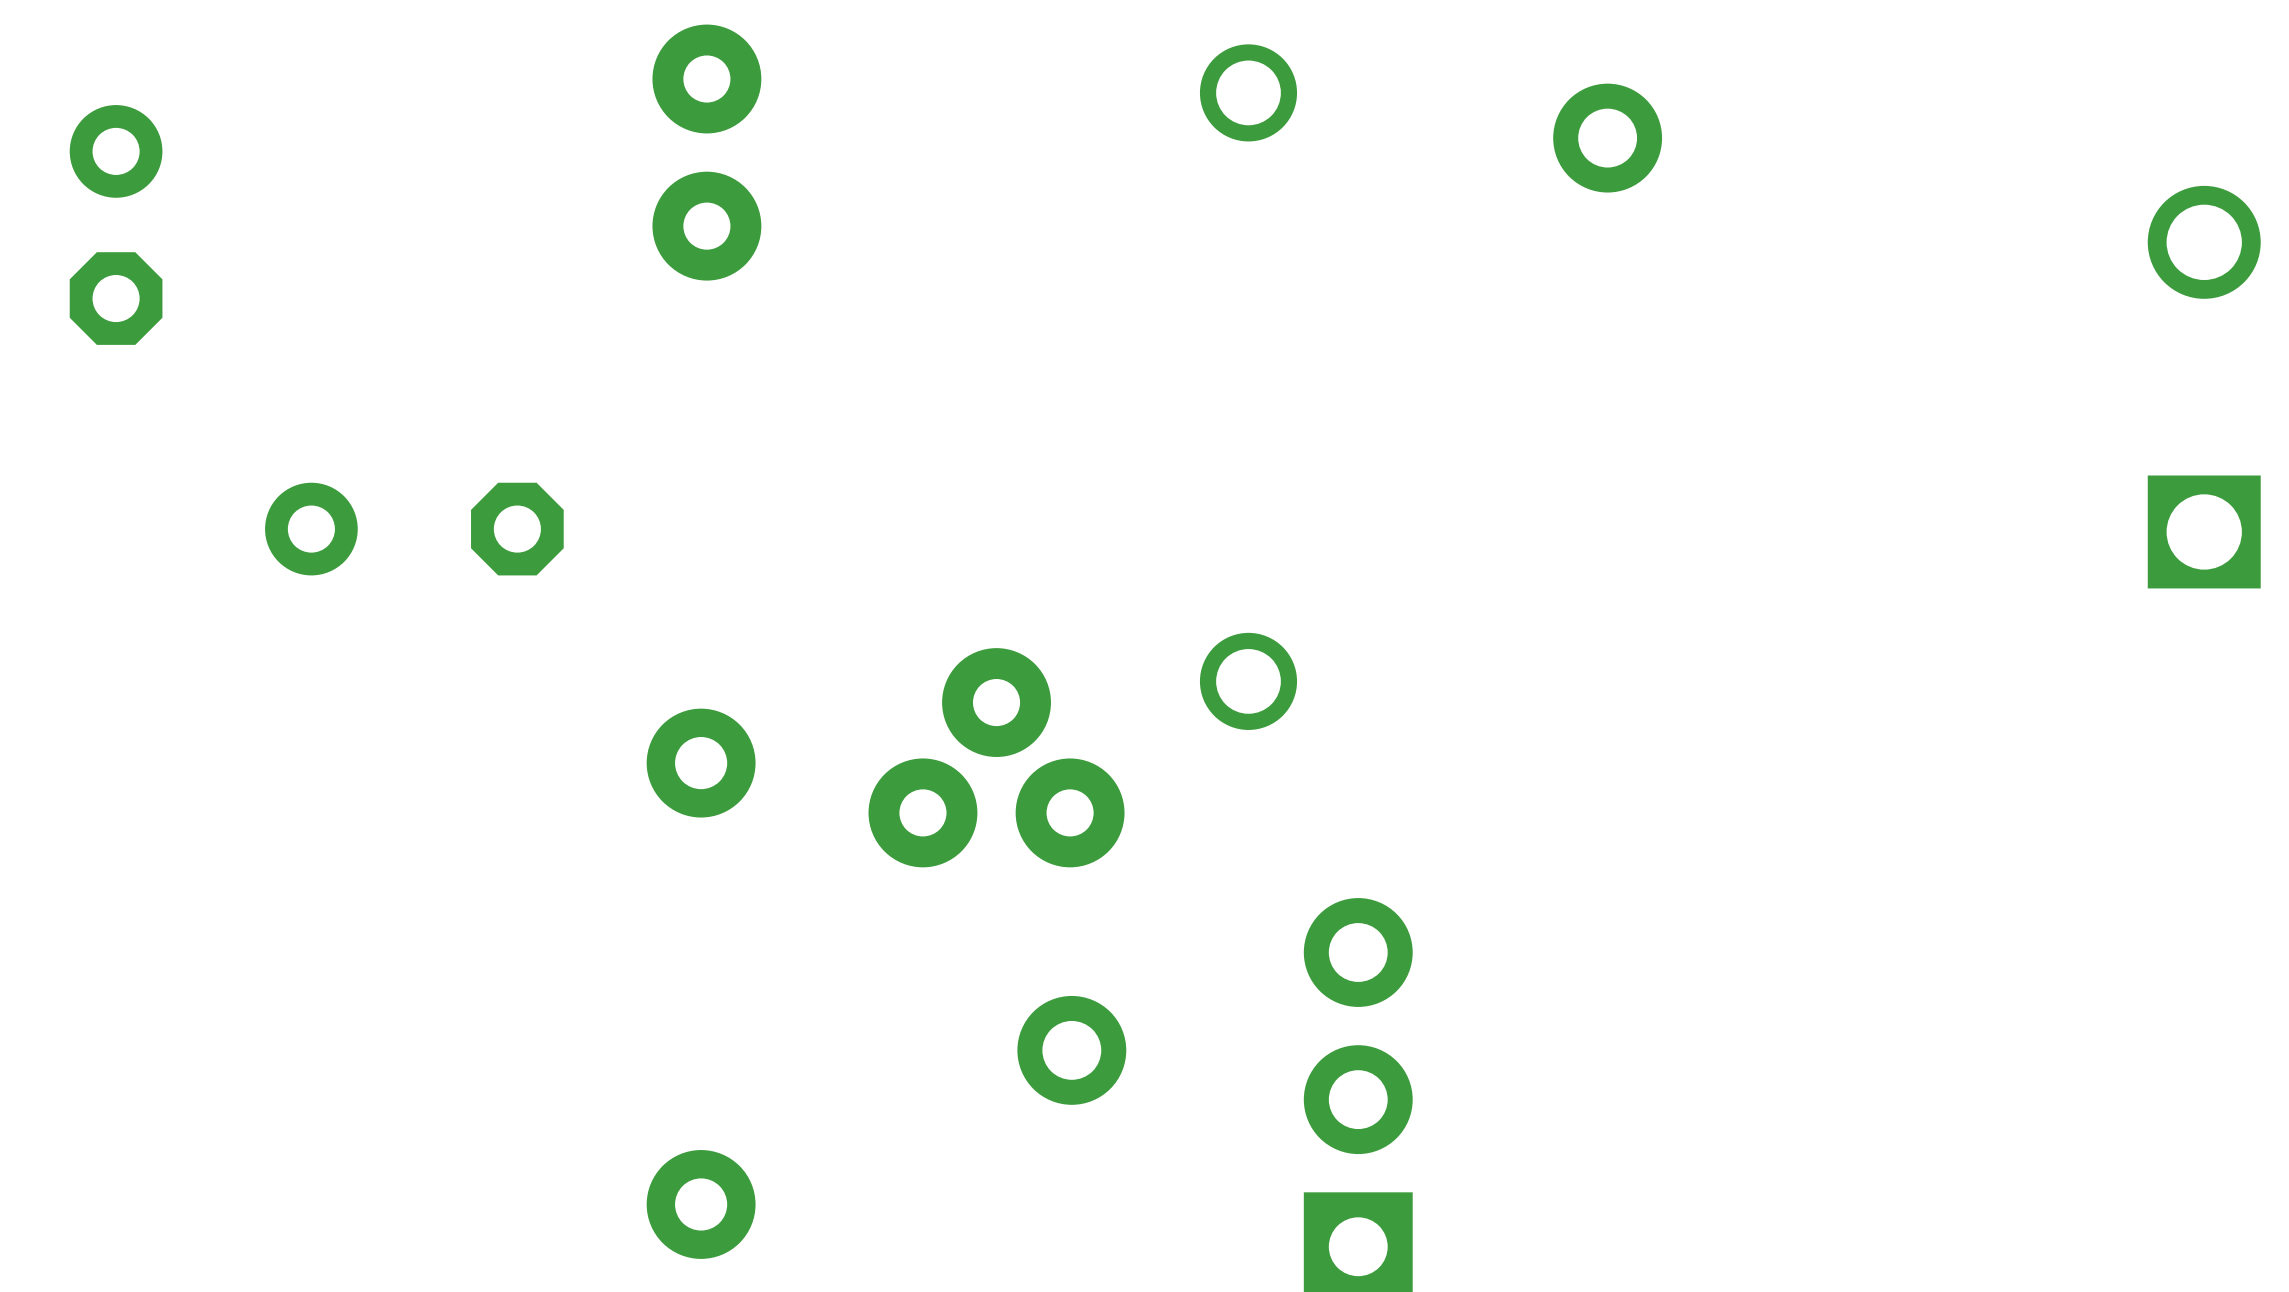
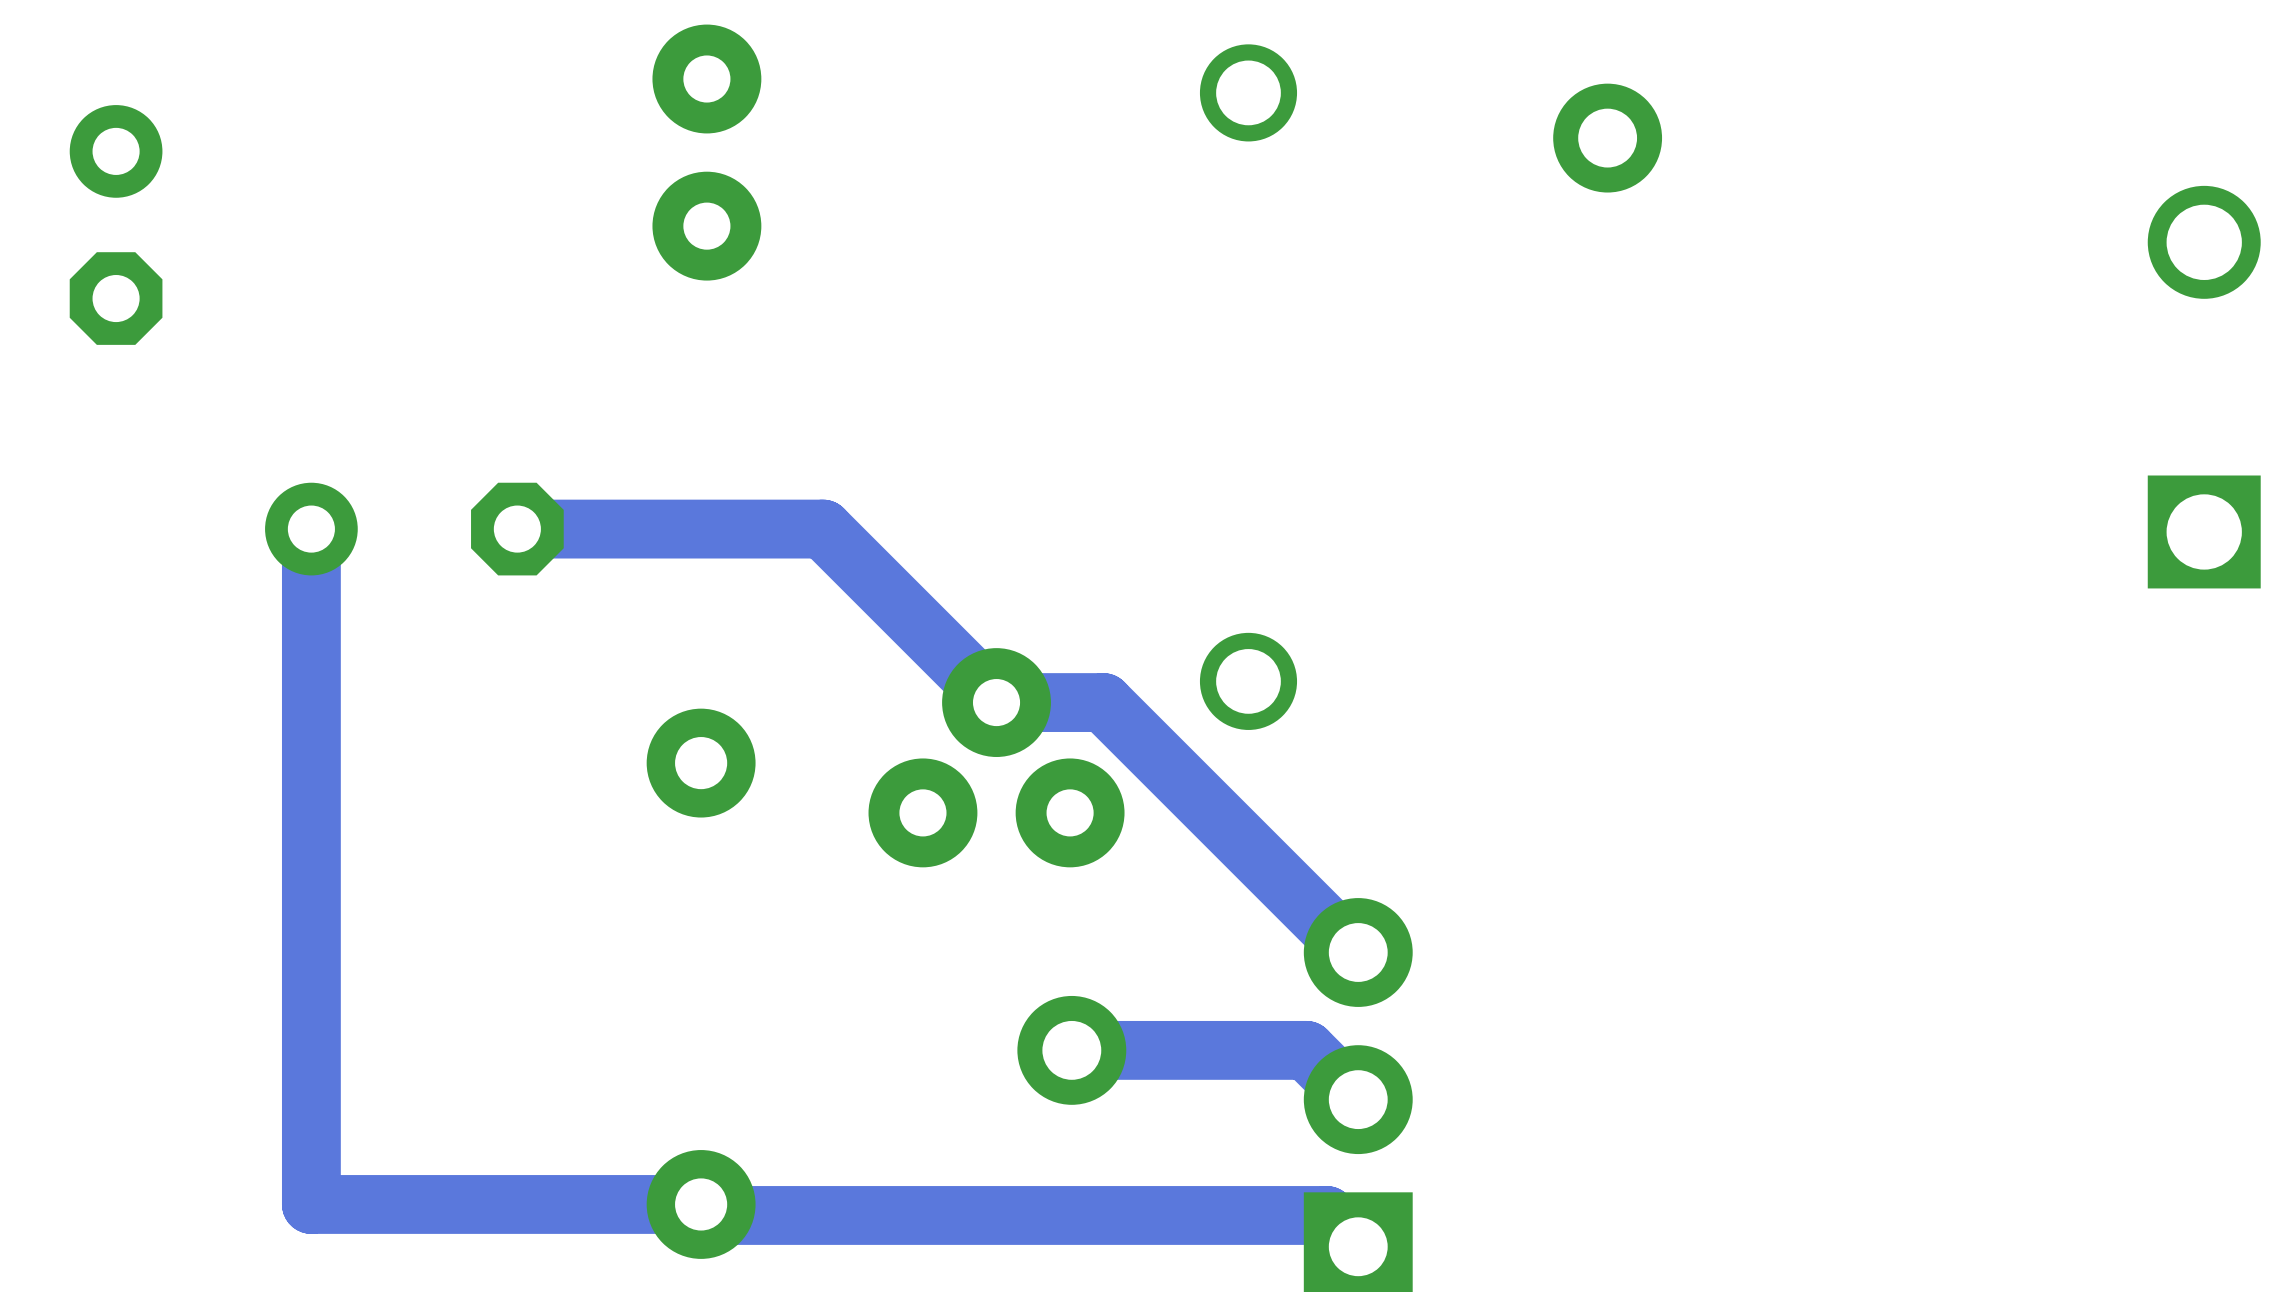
track: none -> (311, 529) (311, 1204) (701, 1204) (730, 1215) (1326, 1215) (1358, 1246)
track: none -> (517, 529) (823, 529) (996, 702) (1103, 702) (1355, 954) (1358, 954) (1358, 952)
track: none -> (1071, 1050) (1306, 1050) (1355, 1099) (1358, 1099)

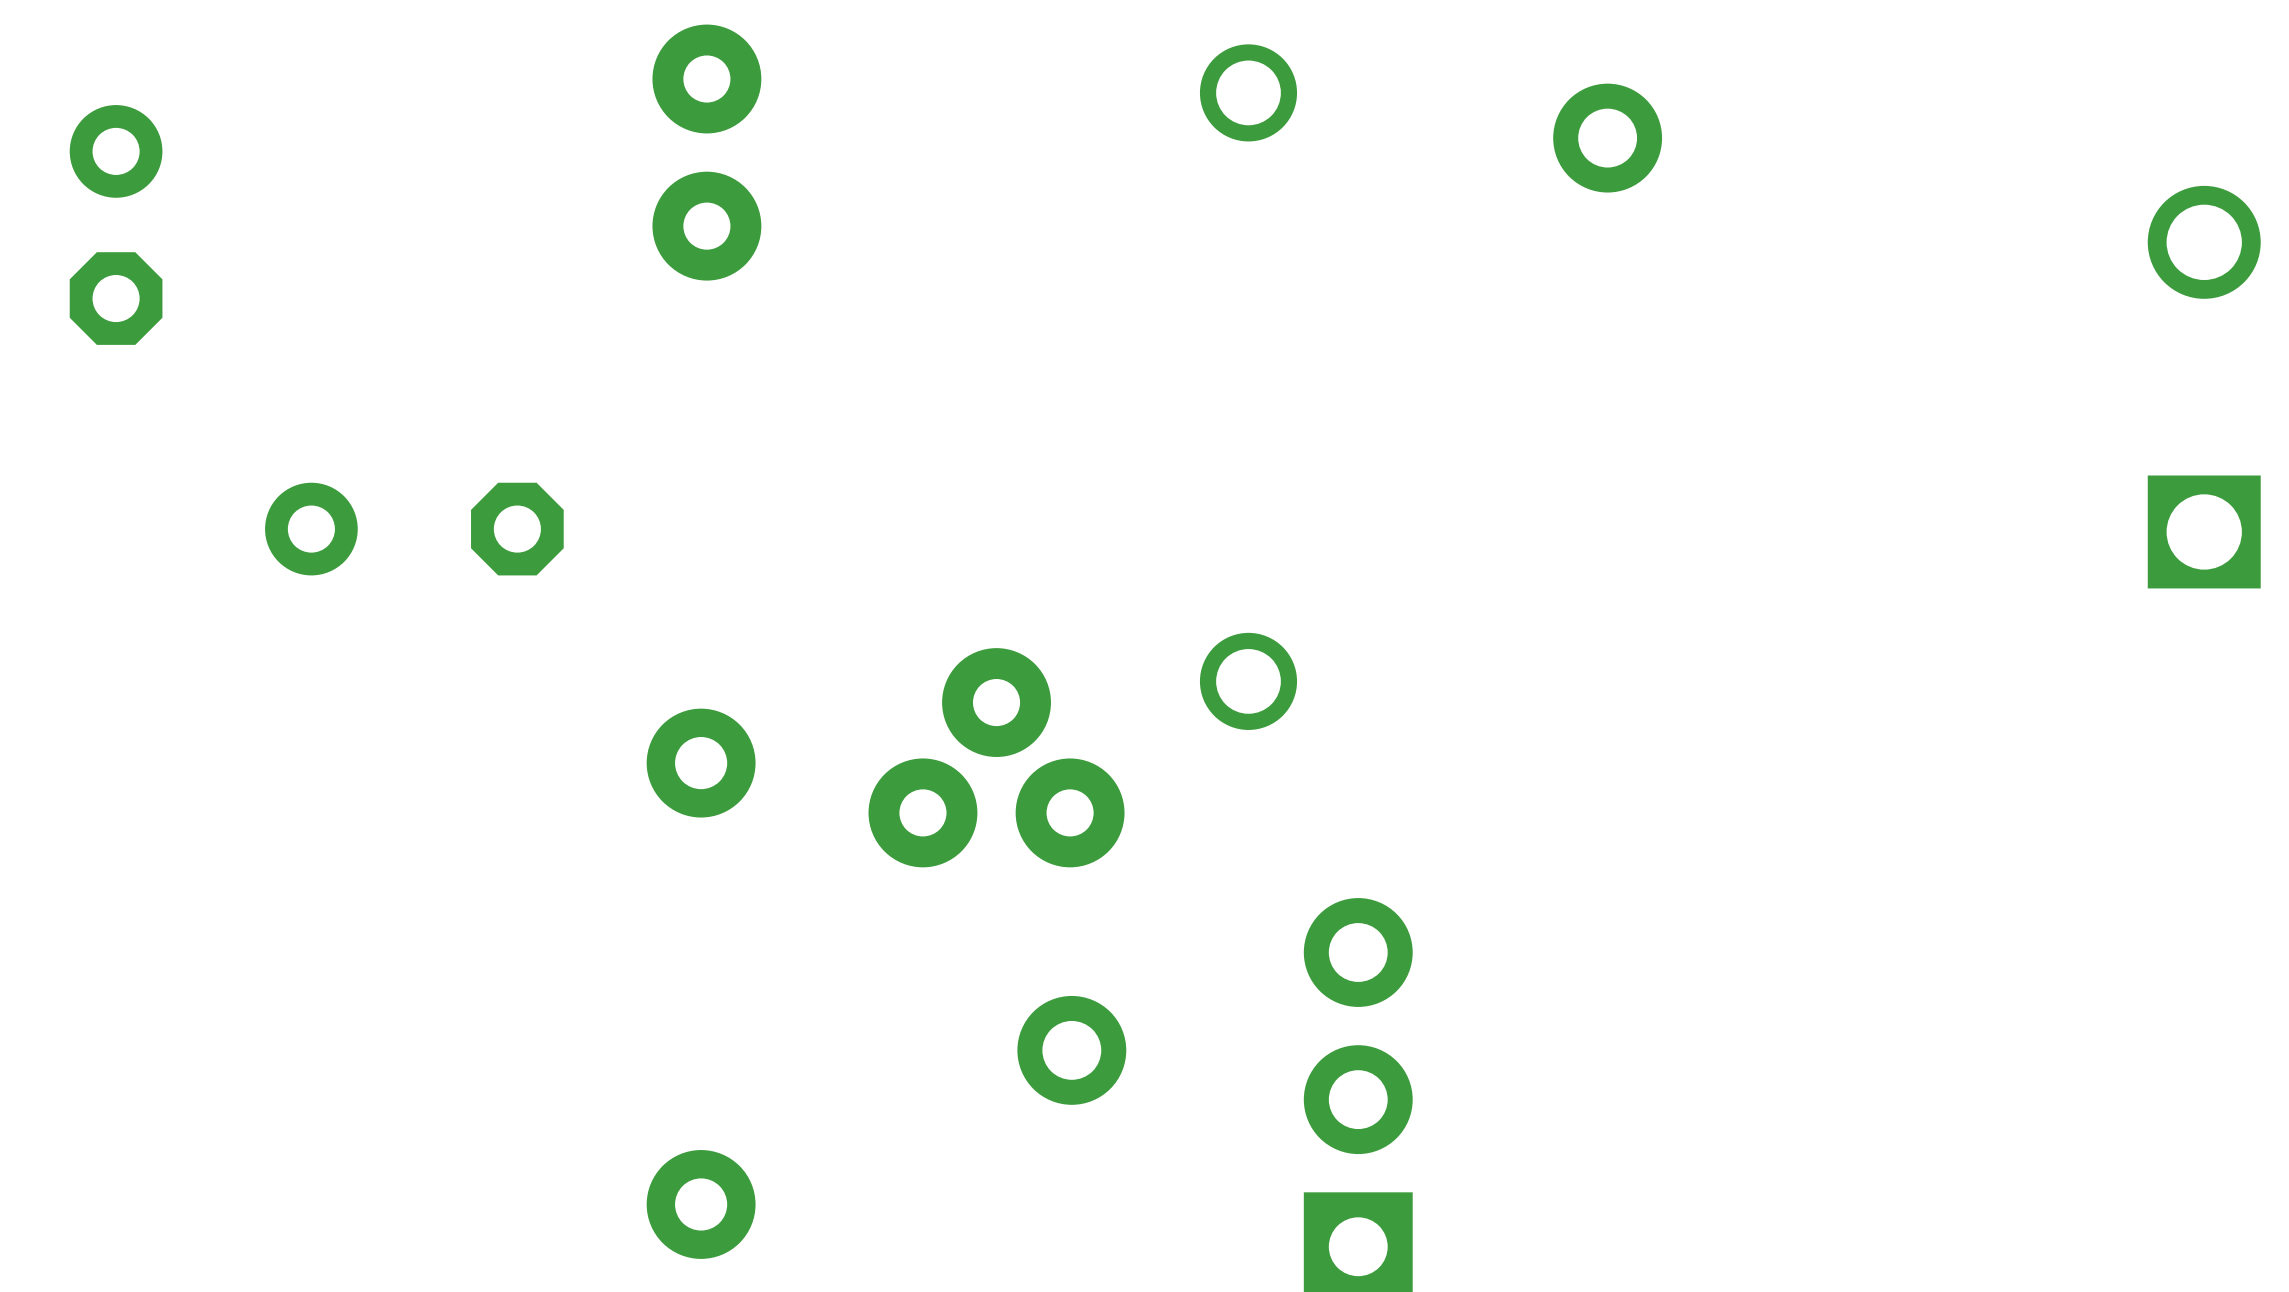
track: (311, 529) (311, 1204) (701, 1204) (730, 1215) (1326, 1215) (1358, 1246) -> none
track: (517, 529) (823, 529) (996, 702) (1103, 702) (1355, 954) (1358, 954) (1358, 952) -> none
track: (1071, 1050) (1306, 1050) (1355, 1099) (1358, 1099) -> none

